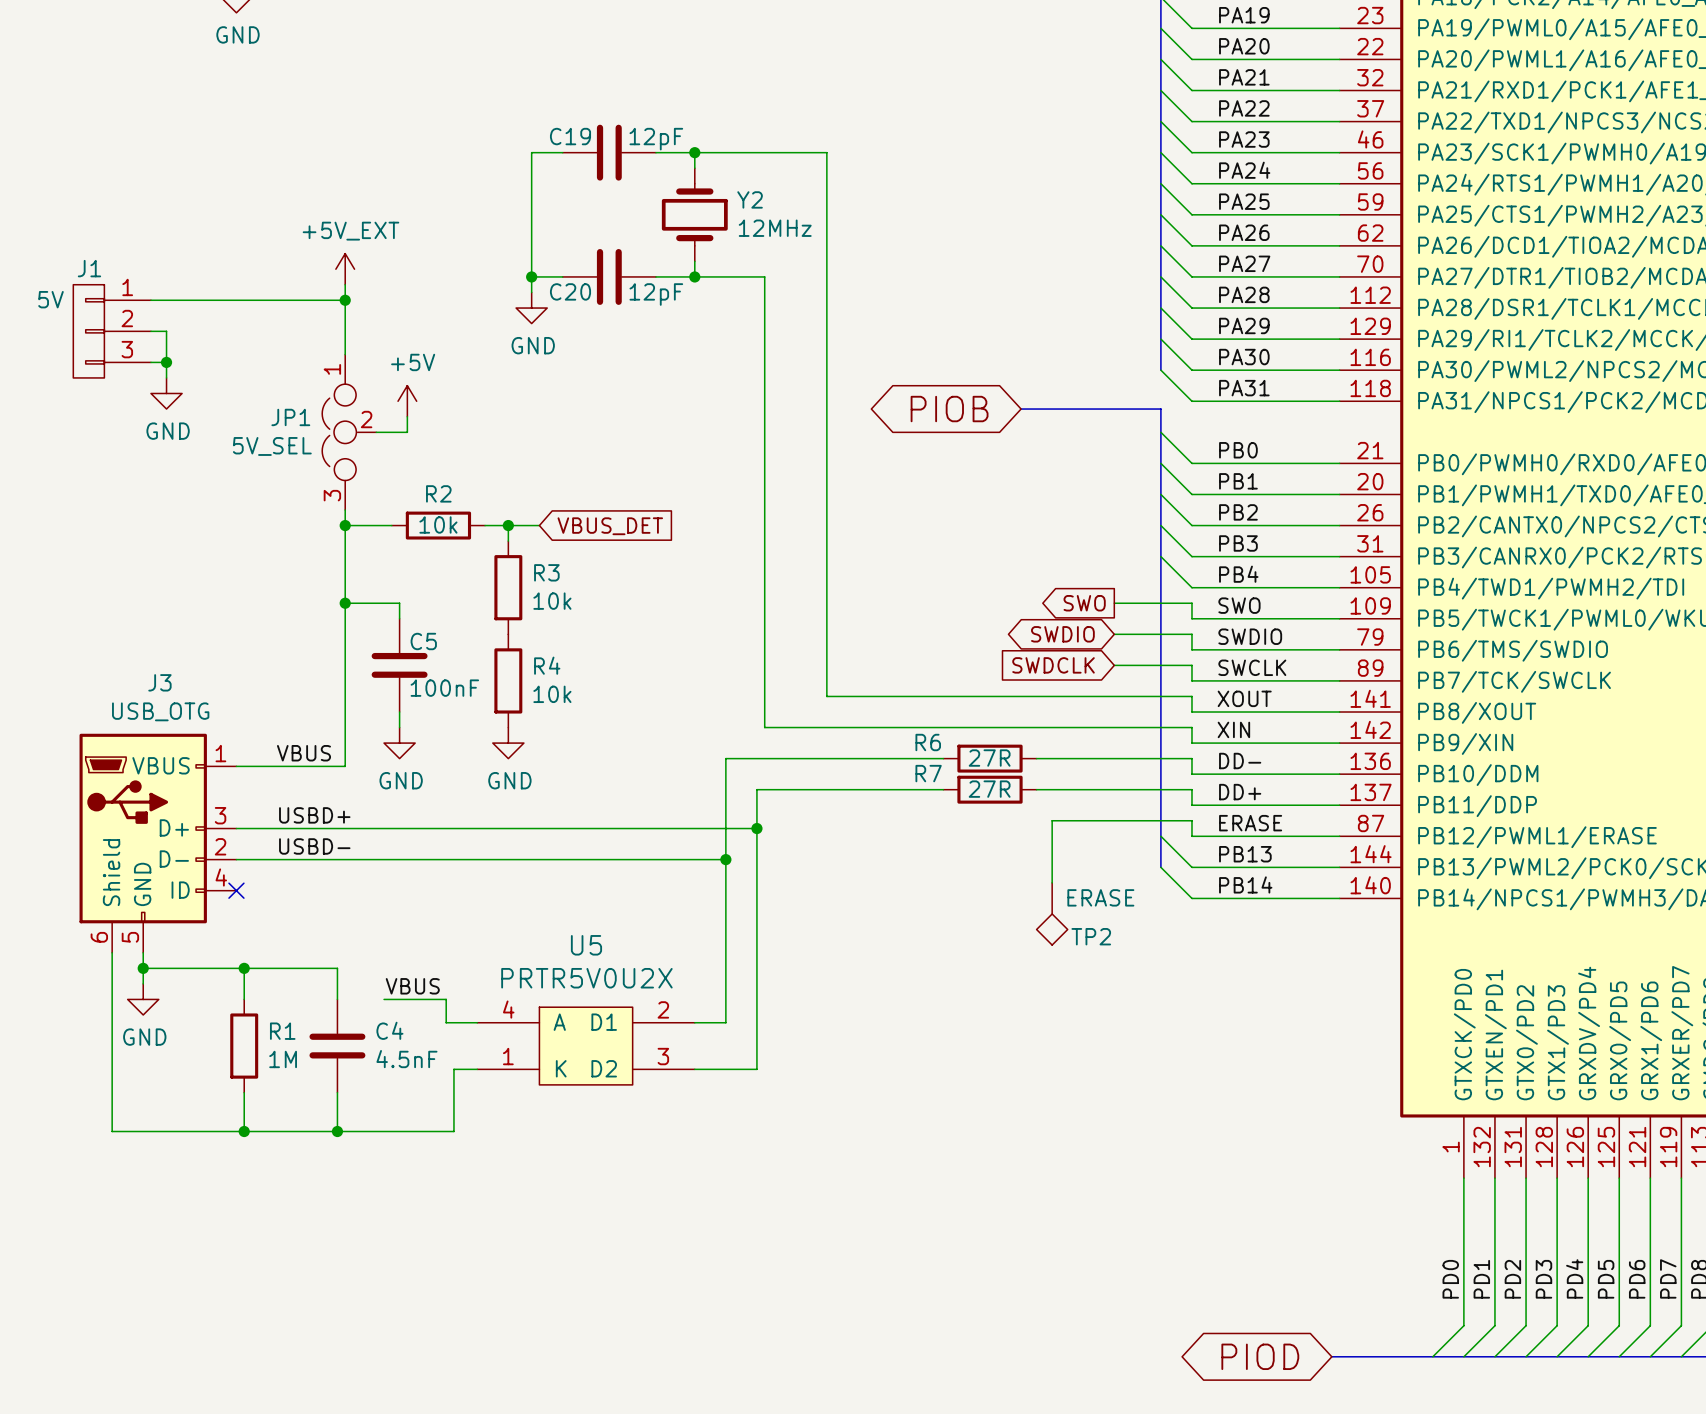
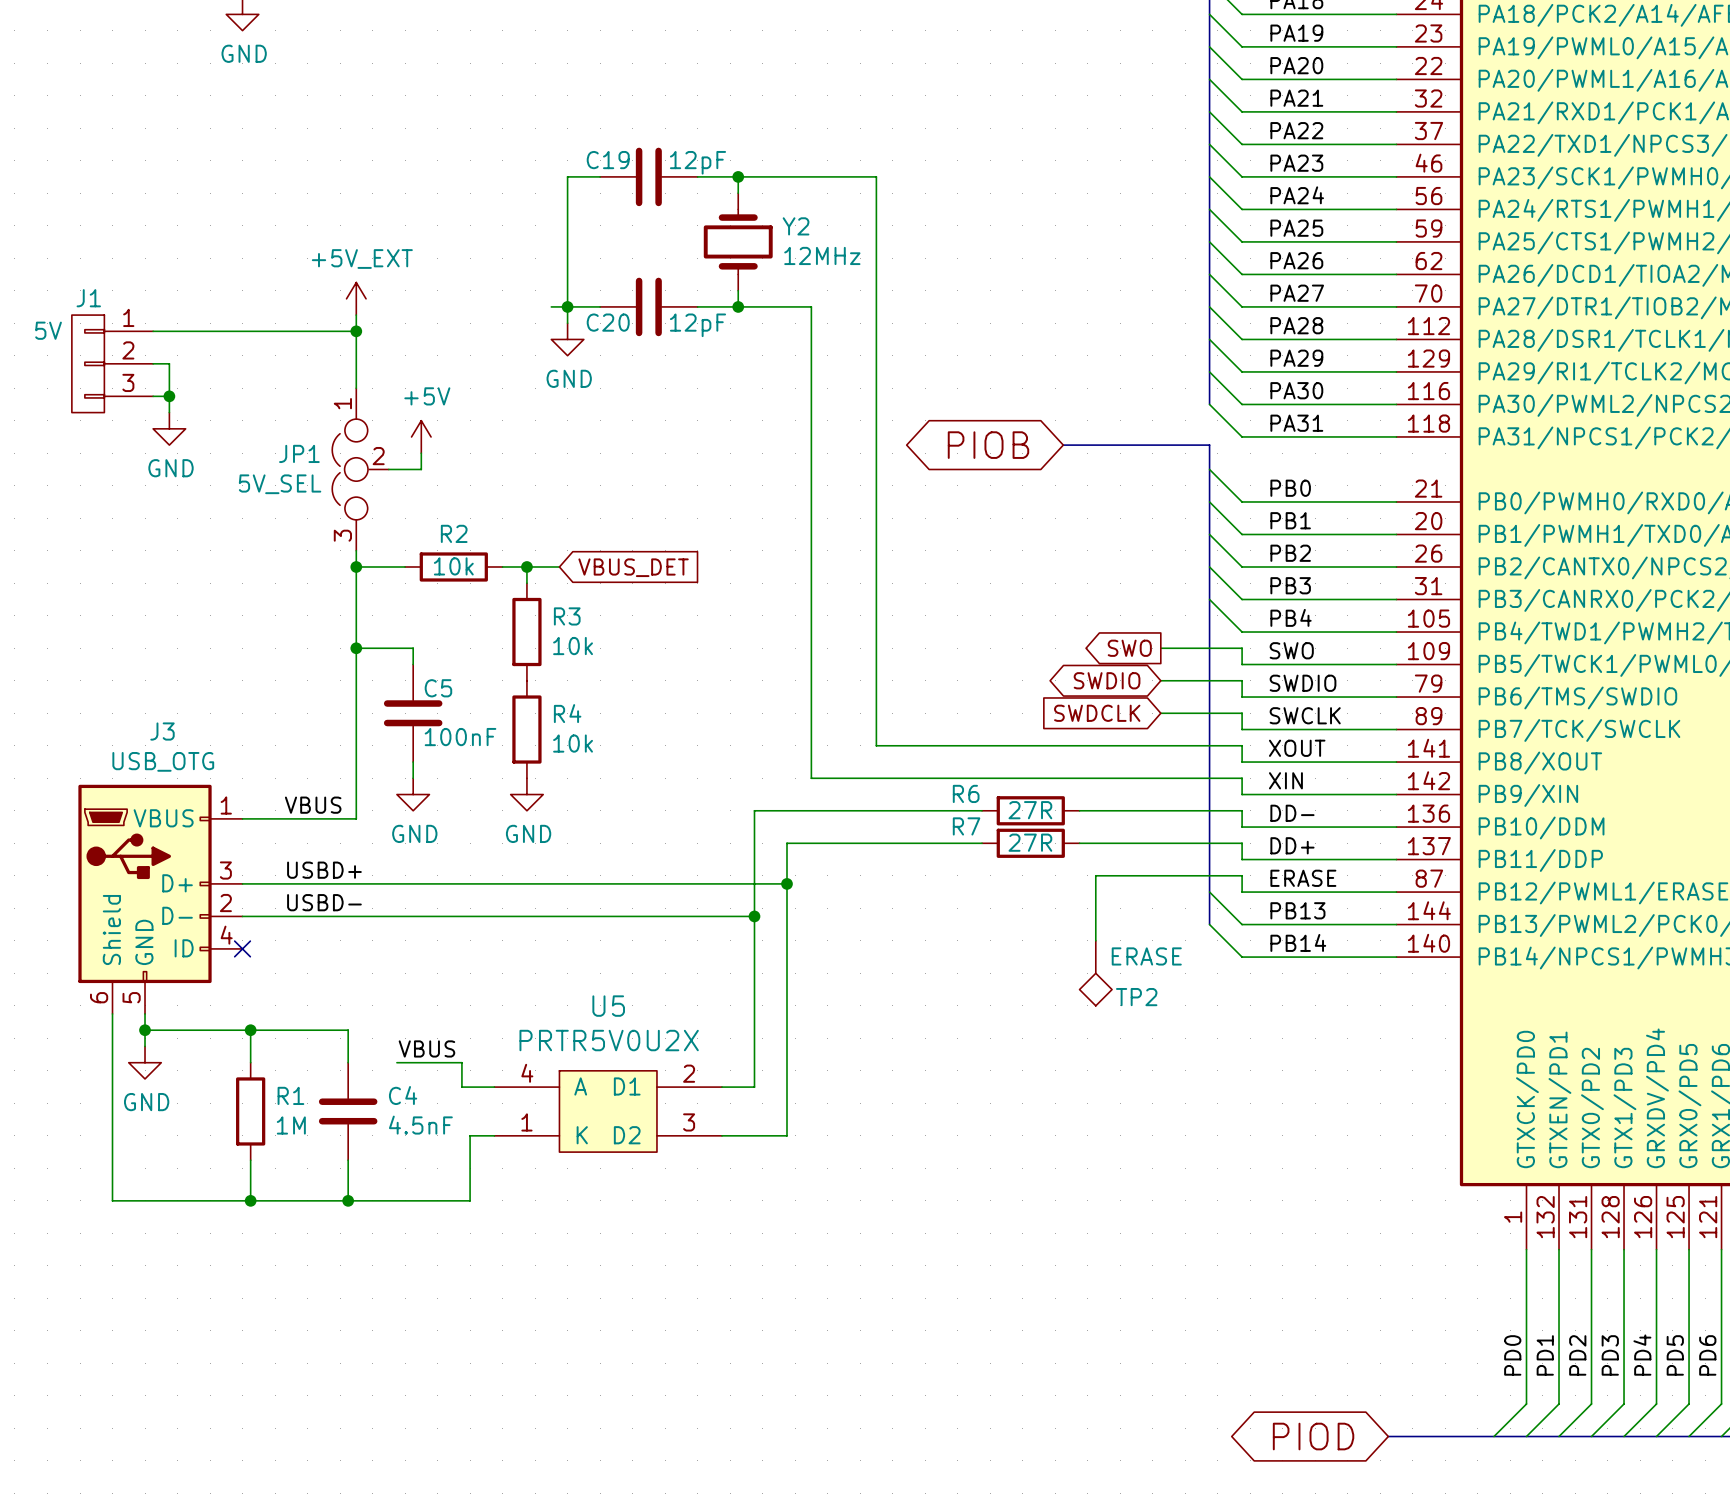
wire: (547, 152) (531, 152) (531, 292) -> (567, 176) (567, 323)
C19 position: (609, 152) -> (648, 176)
wire: (694, 152) (694, 168) -> (738, 176) (738, 193)
junction position: (694, 152) -> (738, 176)
wire: (826, 152) (826, 696) (842, 696) -> (860, 176) (876, 176) (876, 745)
Y2 position: (694, 214) -> (738, 241)
wire: (694, 261) (694, 276) -> (738, 290) (738, 306)
junction position: (531, 276) -> (567, 306)
C20 position: (609, 276) -> (648, 306)
junction position: (694, 276) -> (738, 306)
wire: (764, 276) (764, 727) (780, 727) -> (795, 306) (811, 306) (811, 778)
power symbol position: GND (531, 308) -> GND (567, 339)

